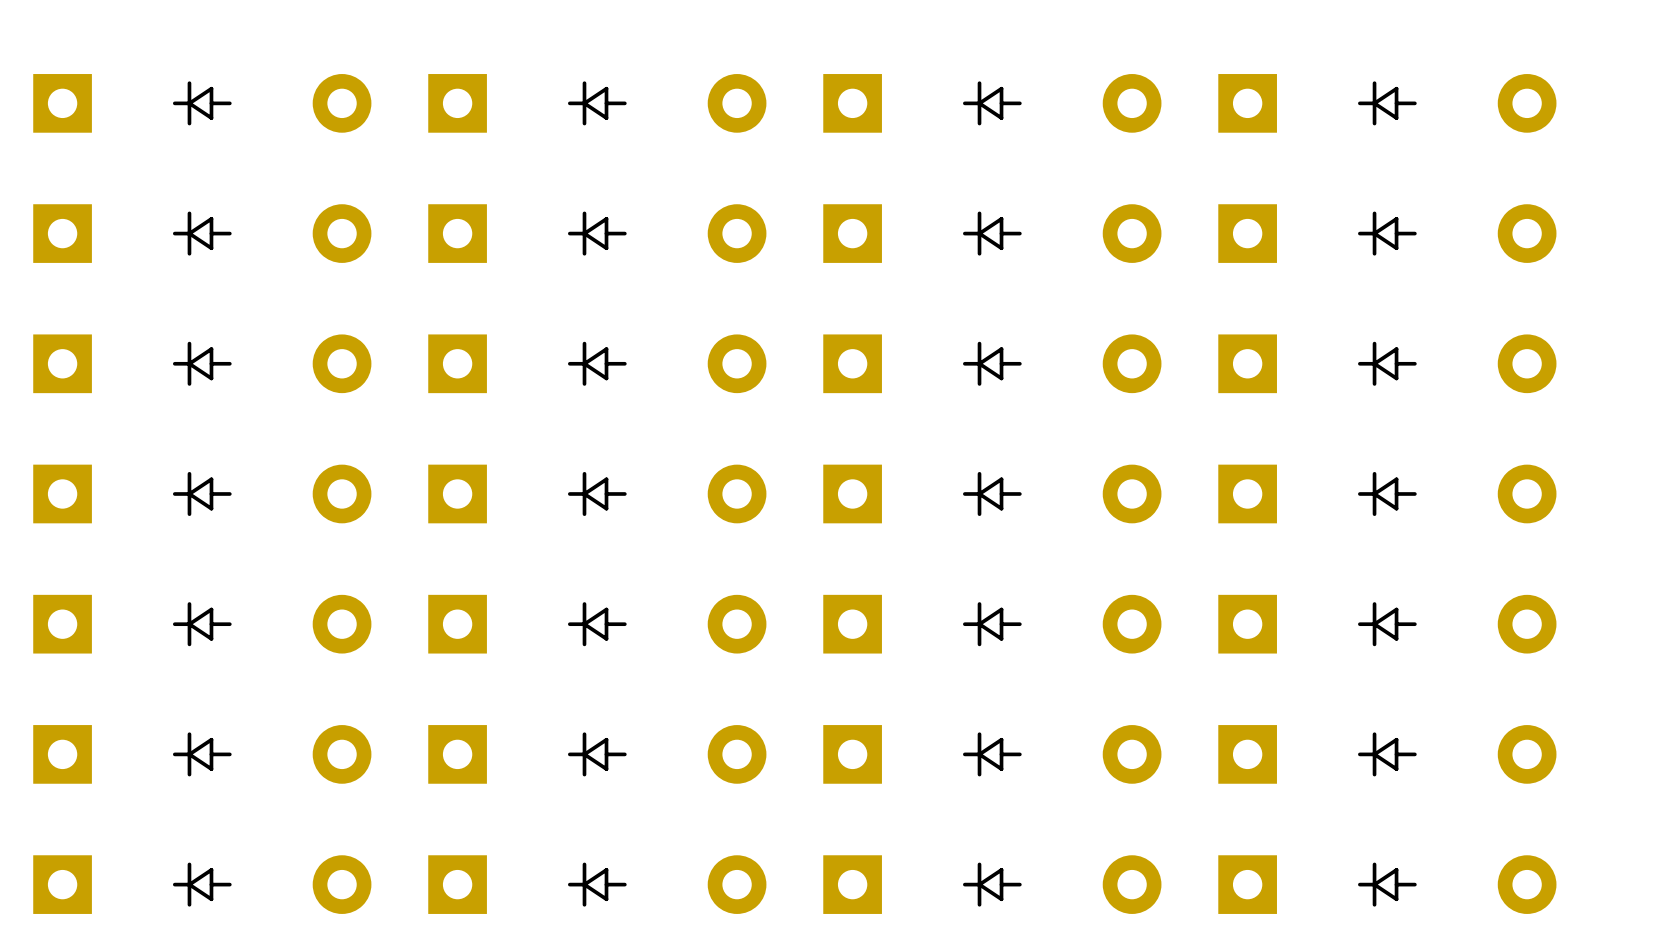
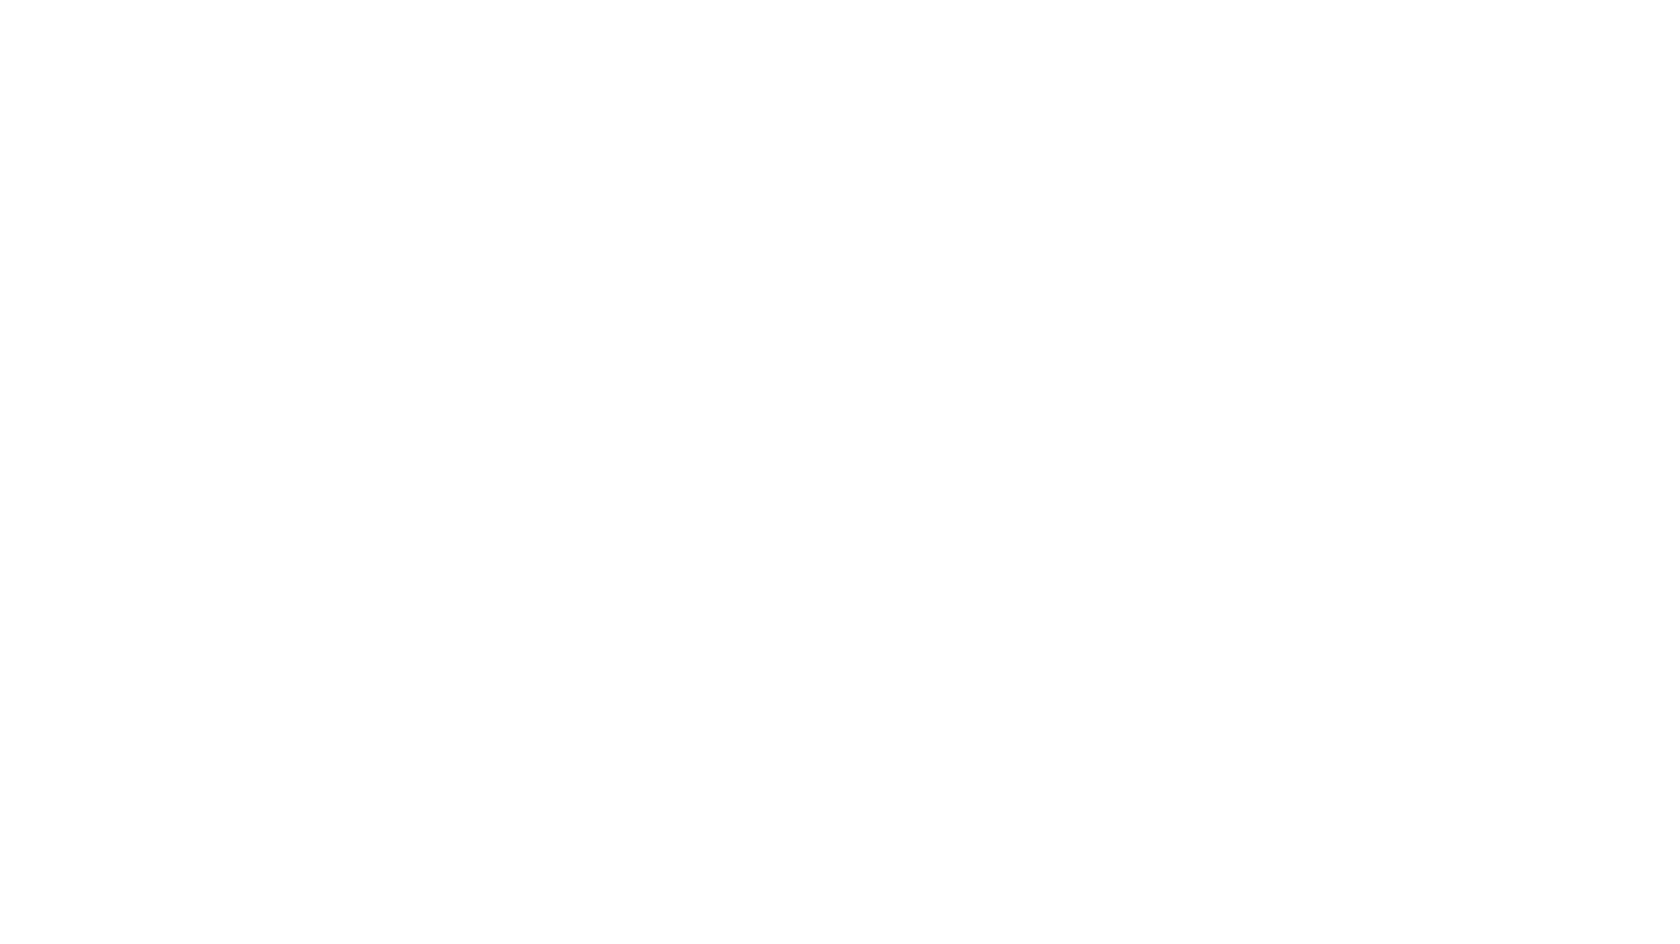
part: (202, 103) -> none
part: (597, 103) -> none
part: (992, 103) -> none
part: (1387, 103) -> none
part: (202, 233) -> none
part: (597, 233) -> none
part: (992, 233) -> none
part: (1387, 233) -> none
part: (202, 363) -> none
part: (597, 363) -> none
part: (992, 363) -> none
part: (1387, 363) -> none
part: (202, 493) -> none
part: (597, 493) -> none
part: (992, 493) -> none
part: (1387, 493) -> none
part: (202, 624) -> none
part: (597, 624) -> none
part: (992, 624) -> none
part: (1387, 624) -> none
part: (202, 754) -> none
part: (597, 754) -> none
part: (992, 754) -> none
part: (1387, 754) -> none
part: (202, 884) -> none
part: (597, 884) -> none
part: (992, 884) -> none
part: (1387, 884) -> none

